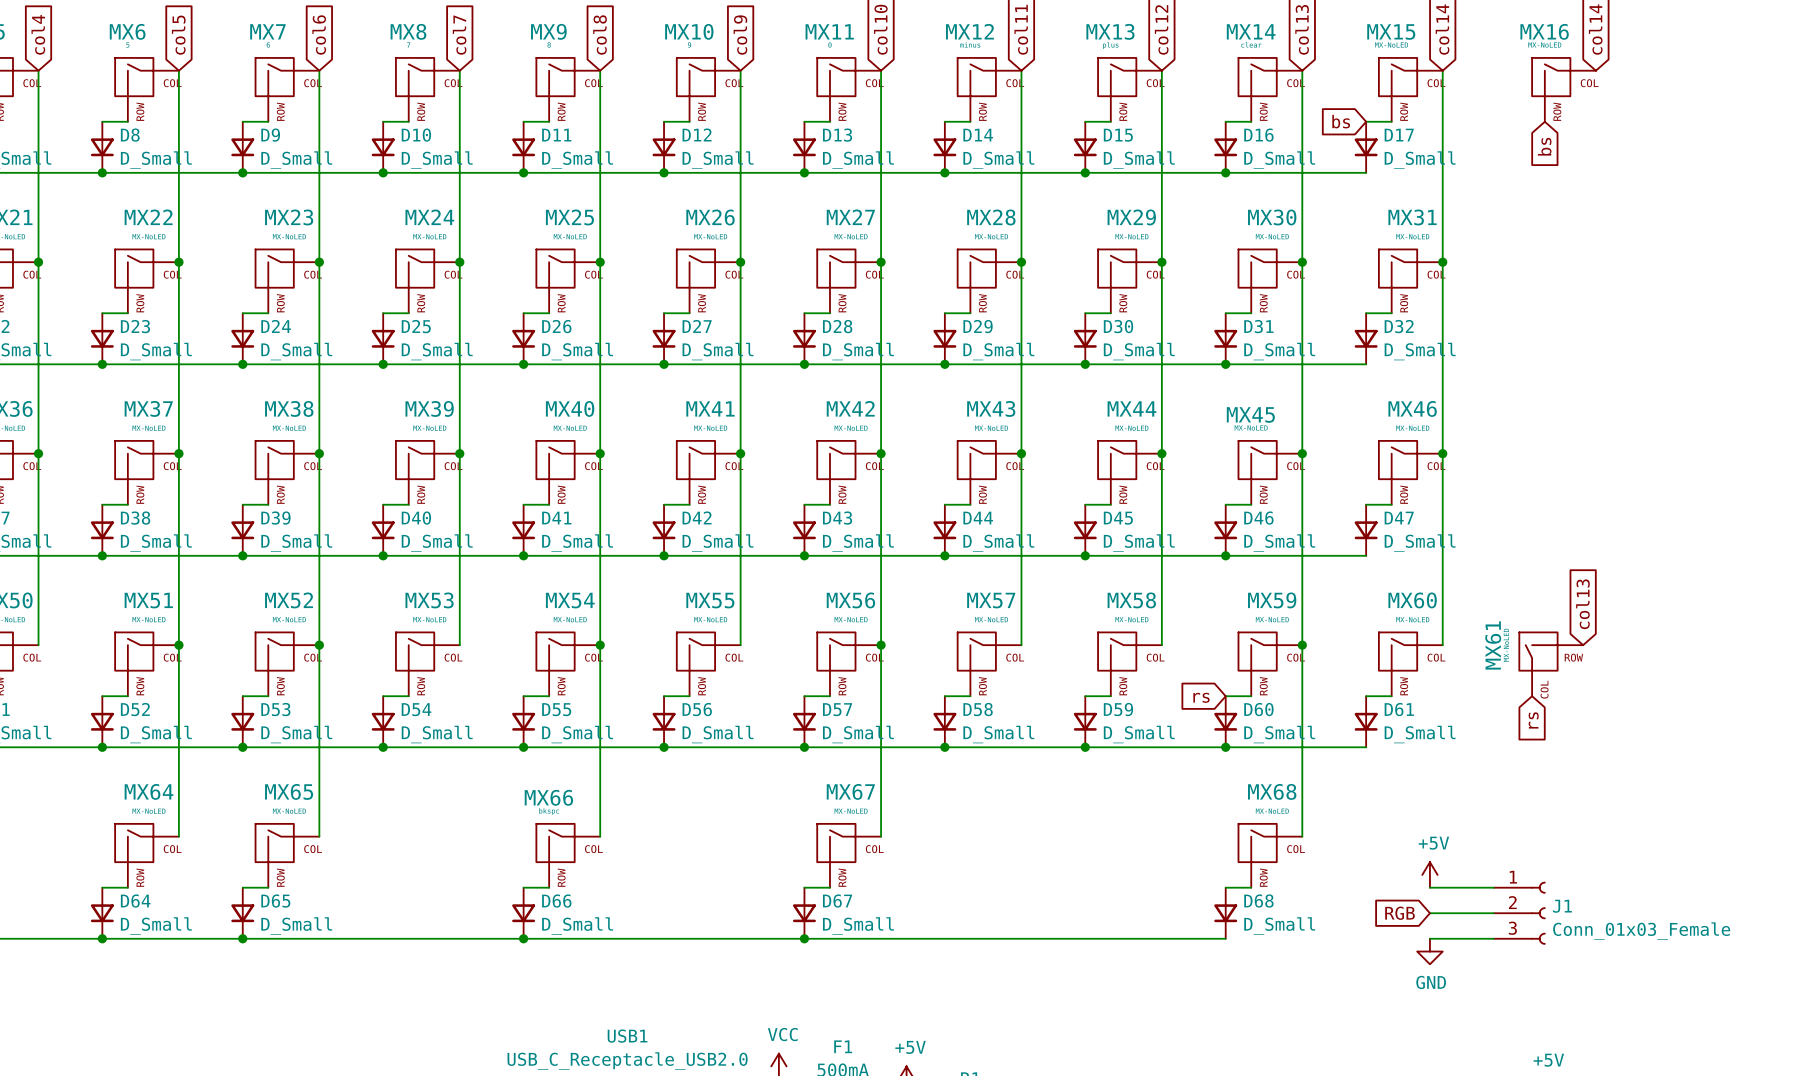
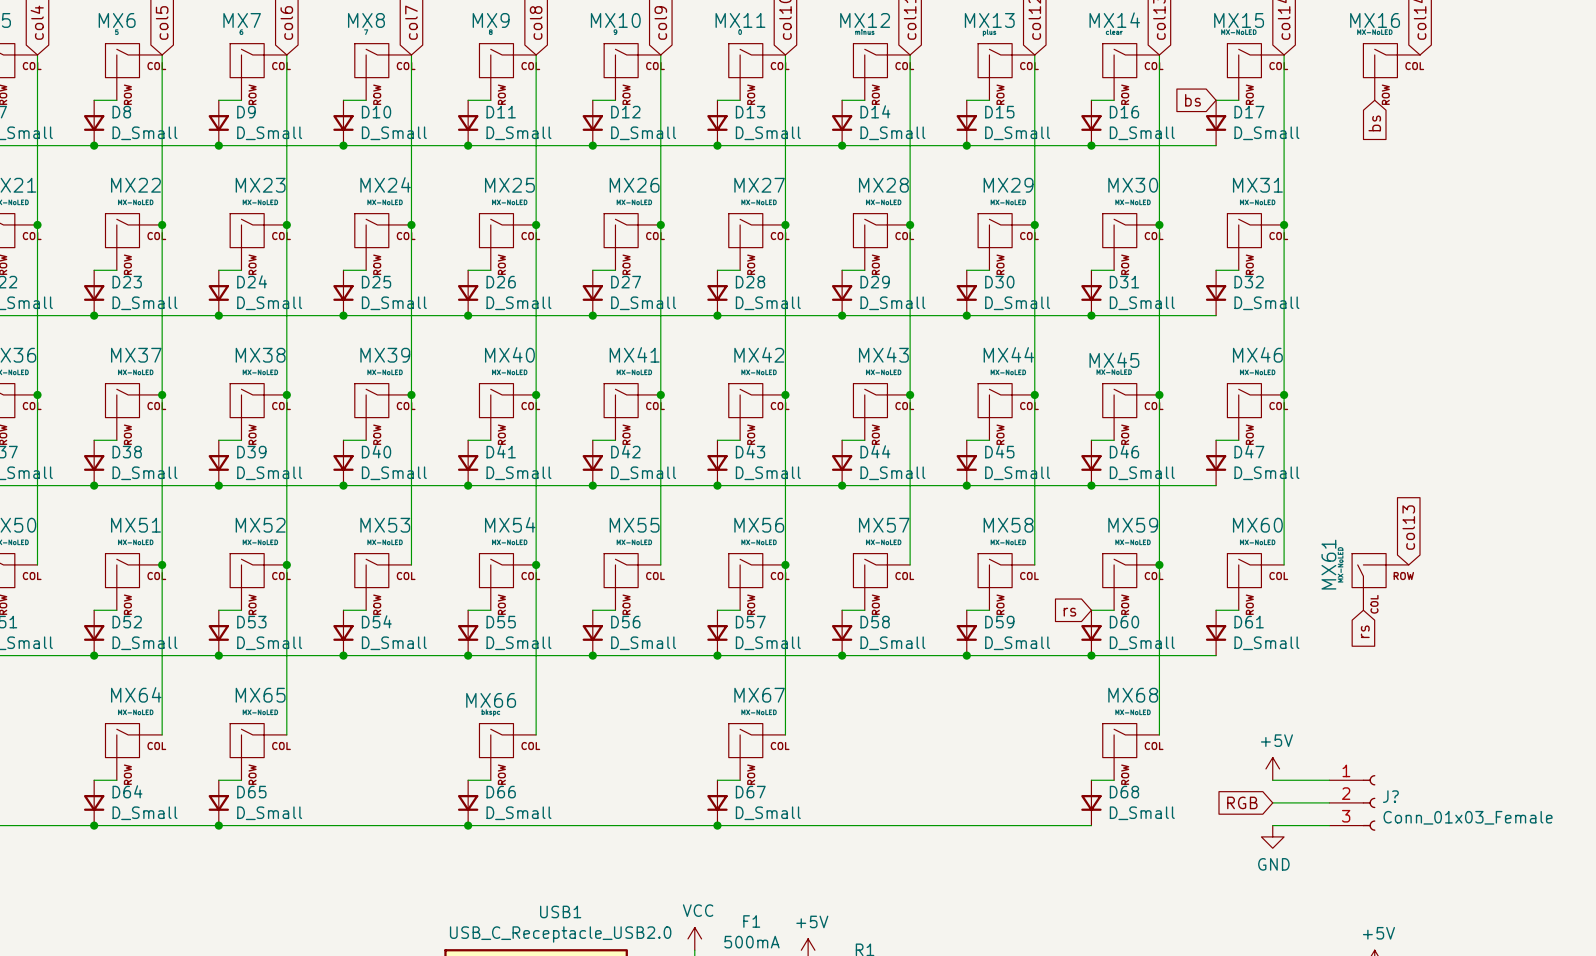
J1 name: J1 (1562, 906) -> J? (1390, 796)

